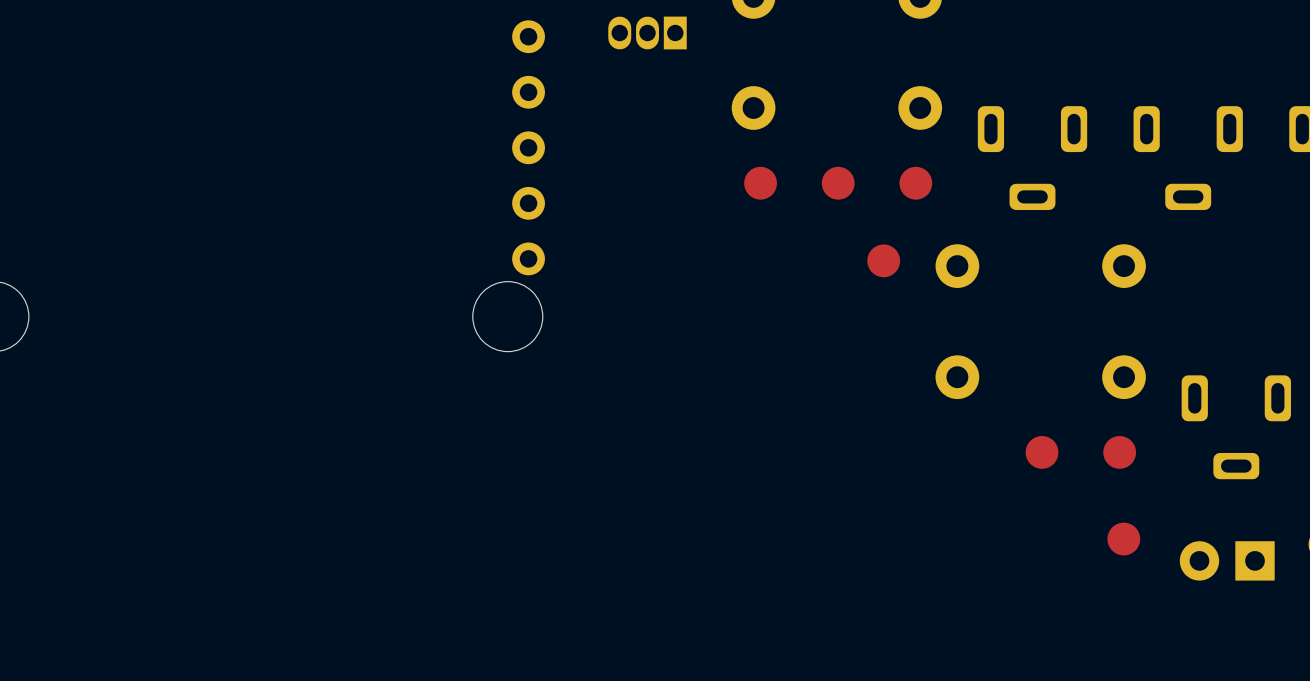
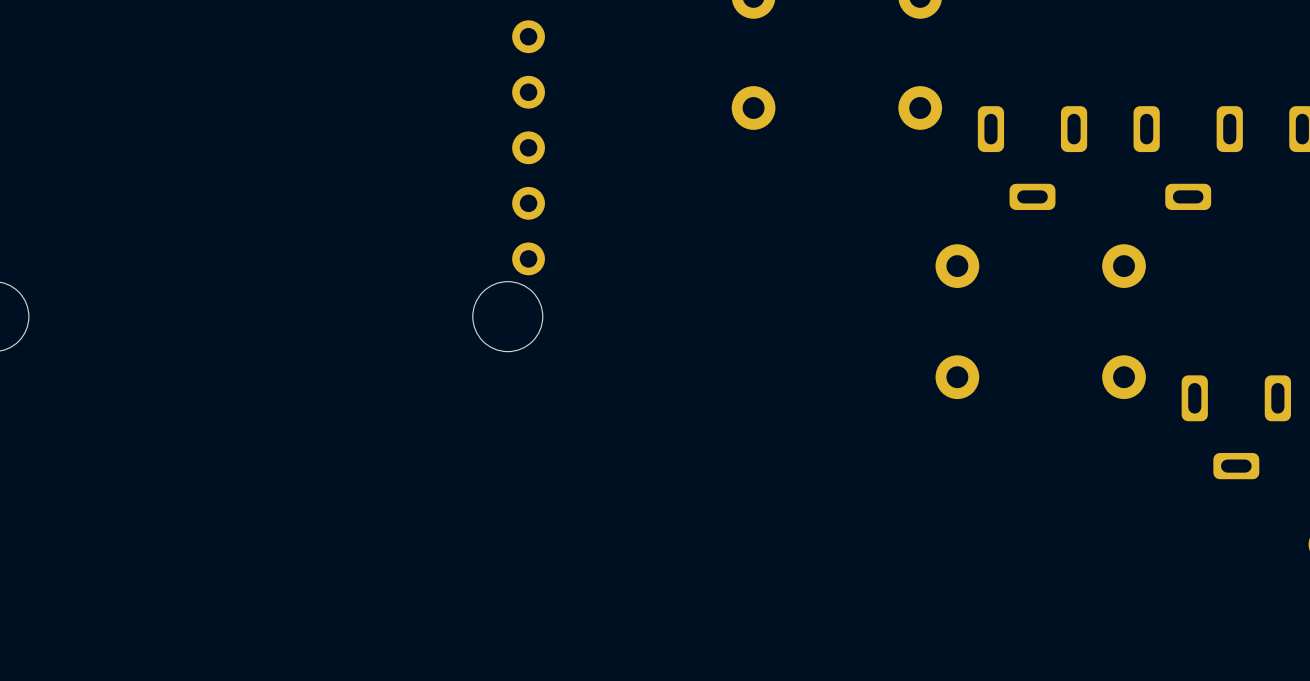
part: (647, 32) -> none
part: (760, 183) -> none
part: (838, 183) -> none
part: (915, 183) -> none
part: (883, 260) -> none
part: (1042, 452) -> none
part: (1119, 452) -> none
part: (1123, 539) -> none
part: (1227, 560) -> none

